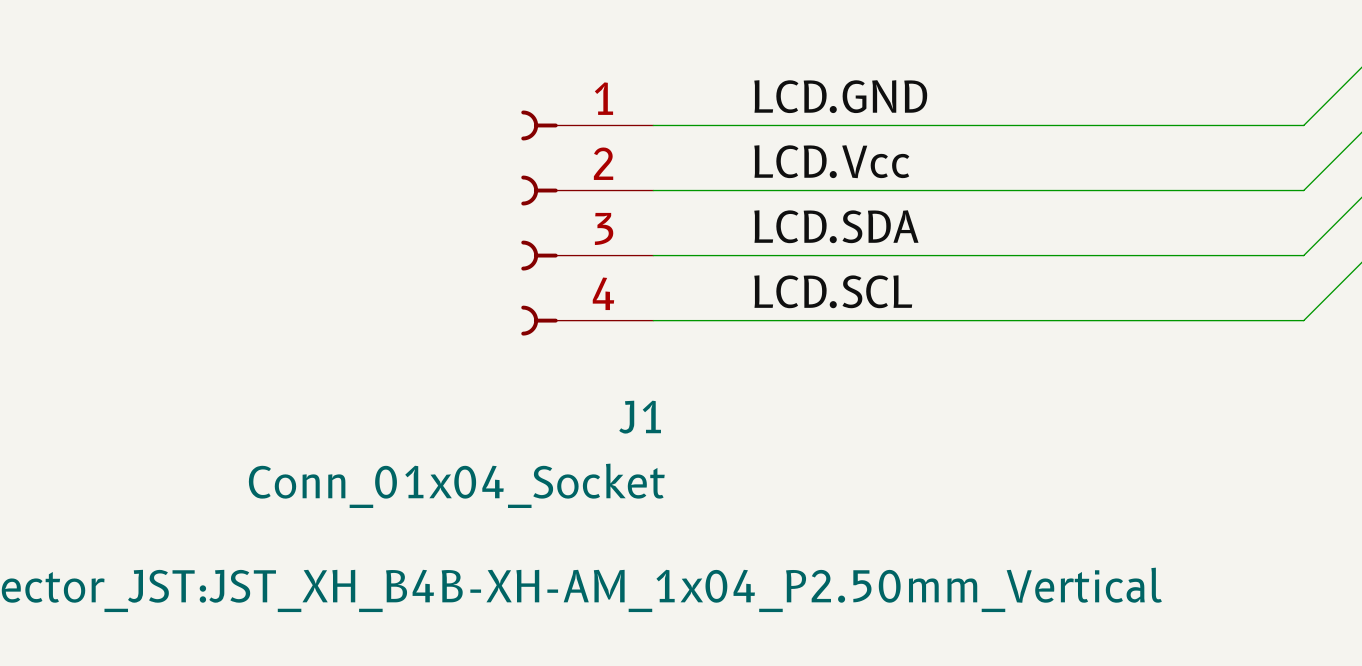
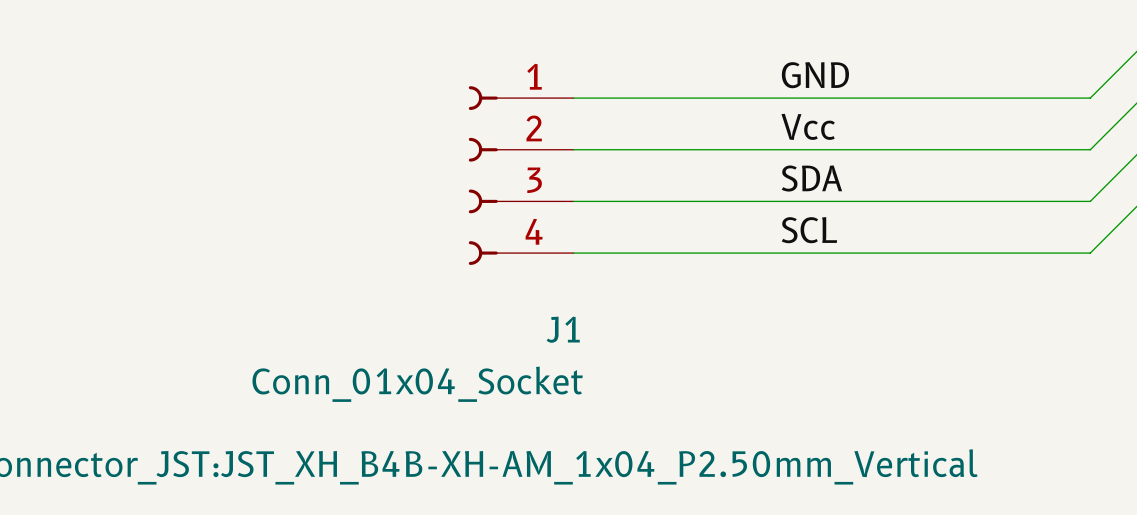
label: LCD.GND (840, 96) -> none
label: none -> GND (815, 75)
label: LCD.Vcc (831, 161) -> none
label: none -> Vcc (808, 126)
label: LCD.SDA (836, 226) -> none
label: none -> SDA (811, 178)
label: LCD.SCL (833, 291) -> none
label: none -> SCL (809, 230)

